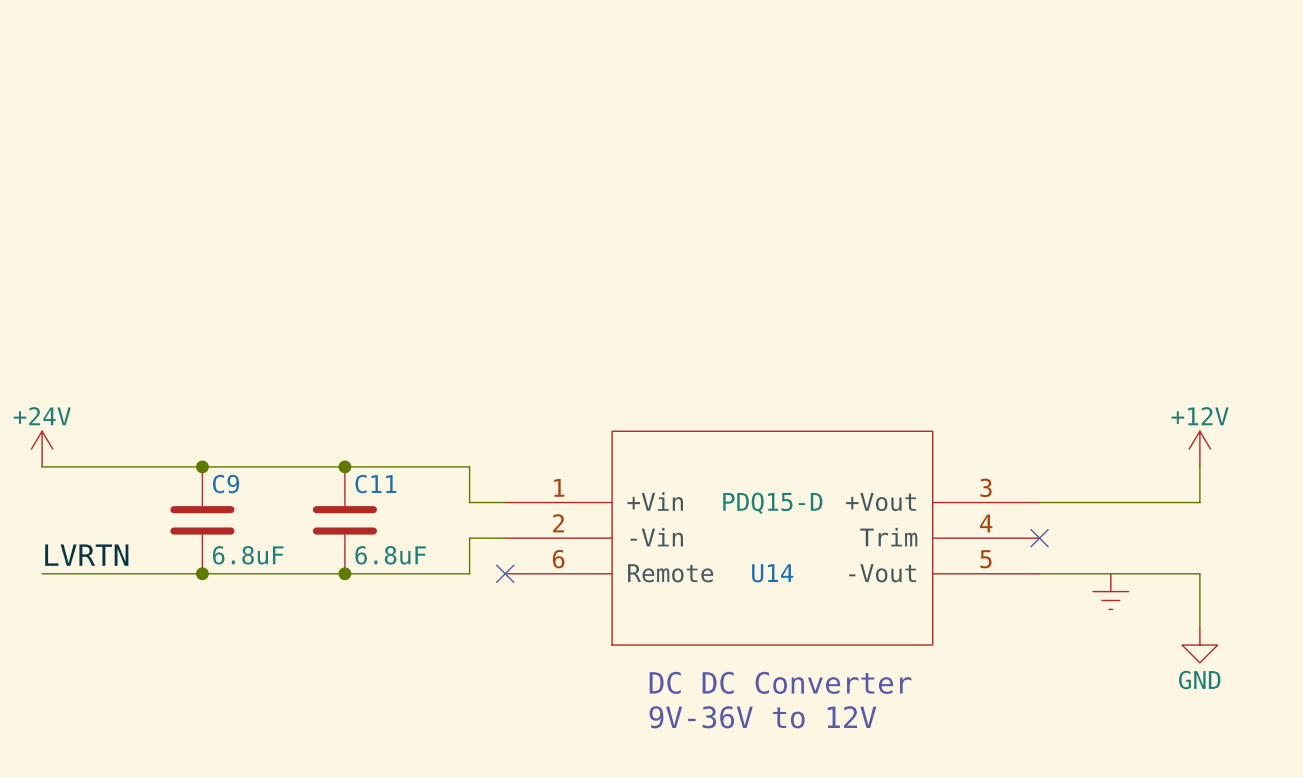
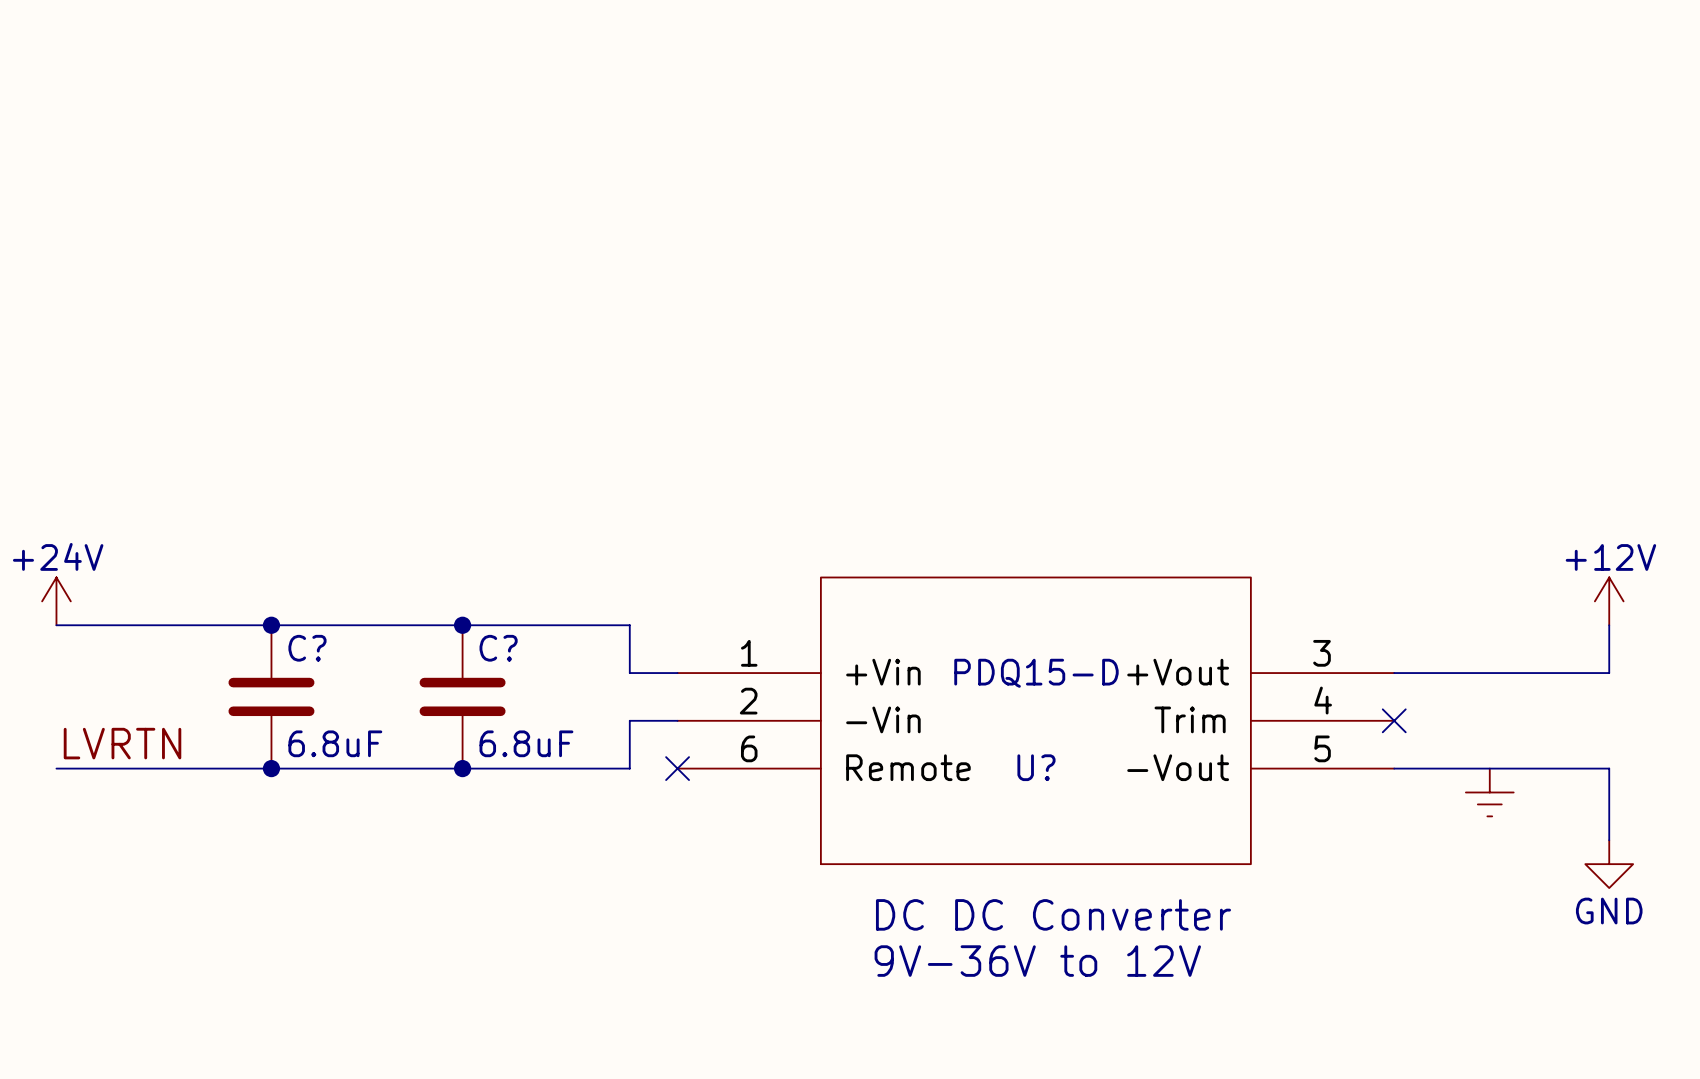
C9 name: C9 (226, 484) -> C? (307, 648)
C11 name: C11 (375, 484) -> C? (498, 648)
U14 name: U14 (772, 573) -> U? (1036, 767)

